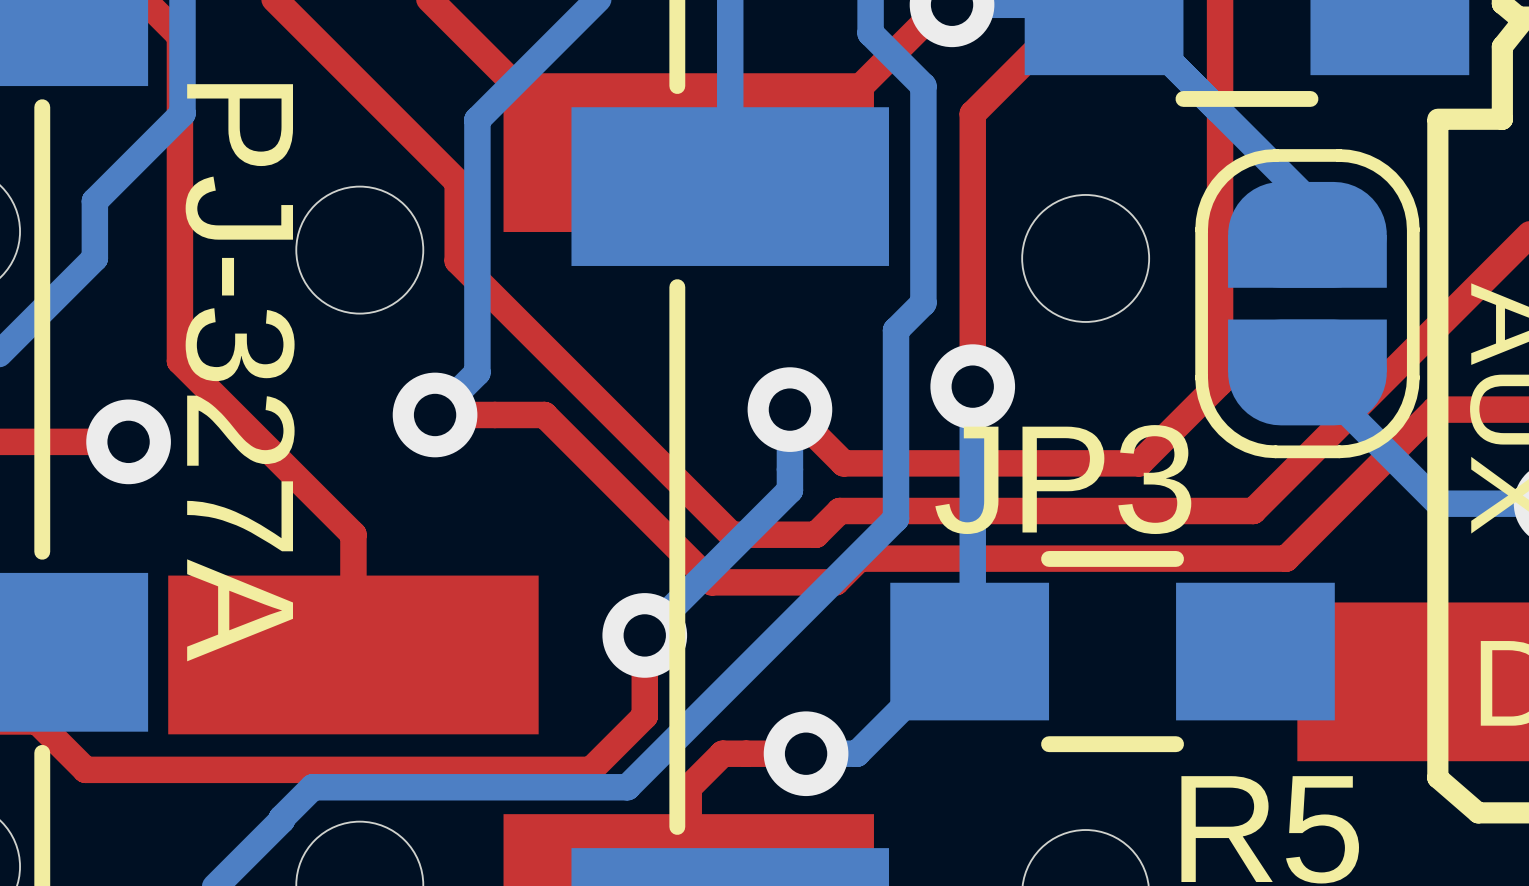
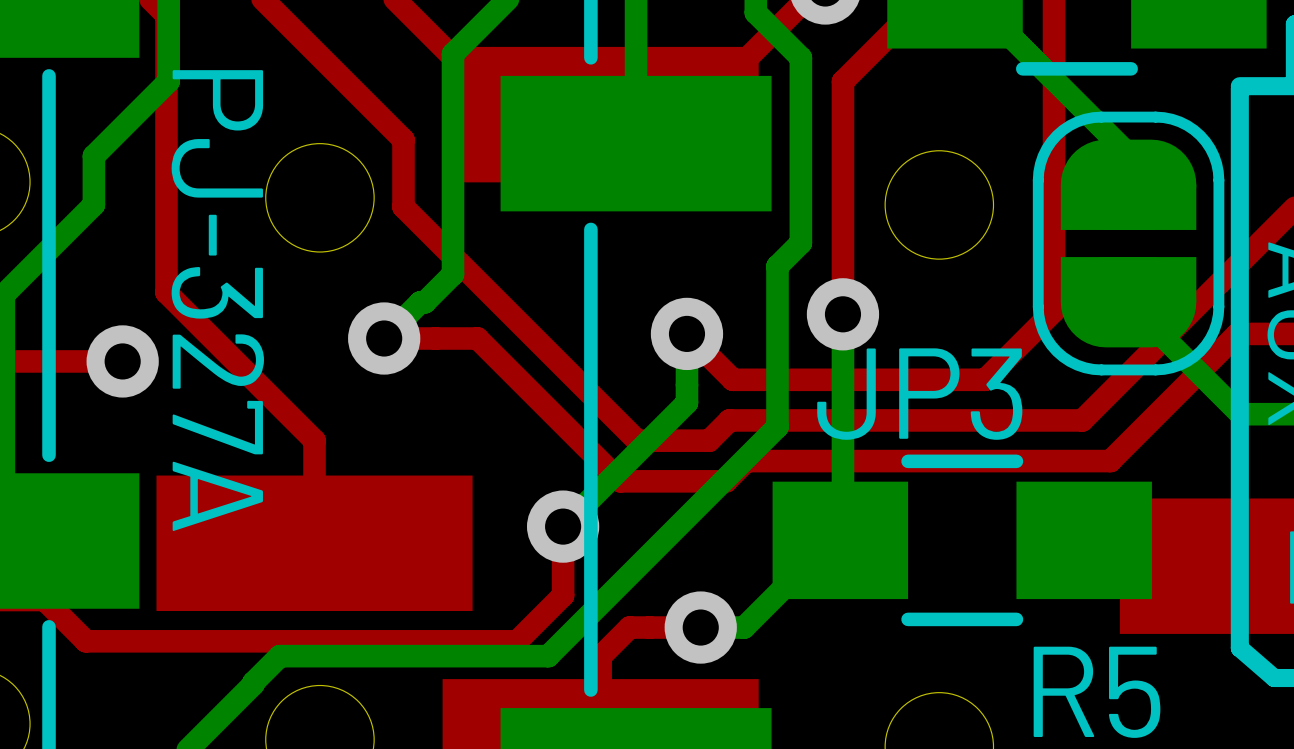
bottom track: (515, 81) (477, 119) (477, 372) -> (453, 54) (453, 274) (424, 302) (420, 302)

